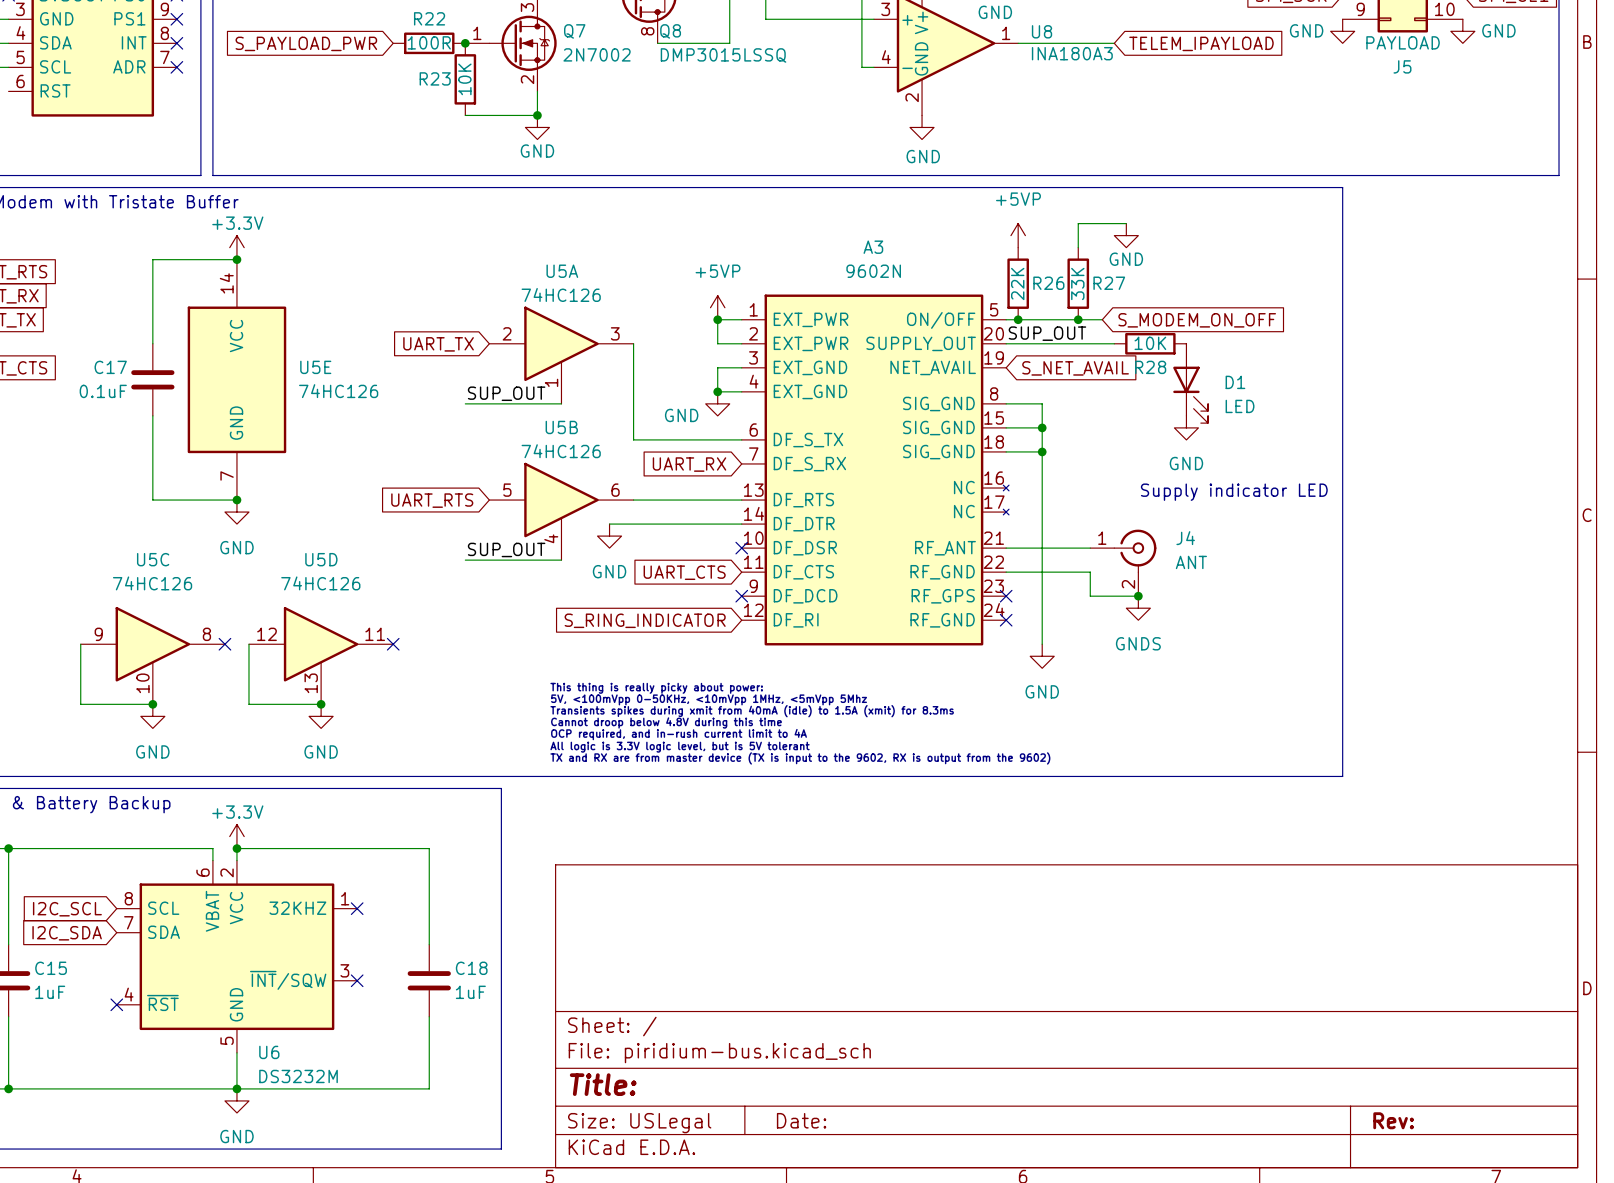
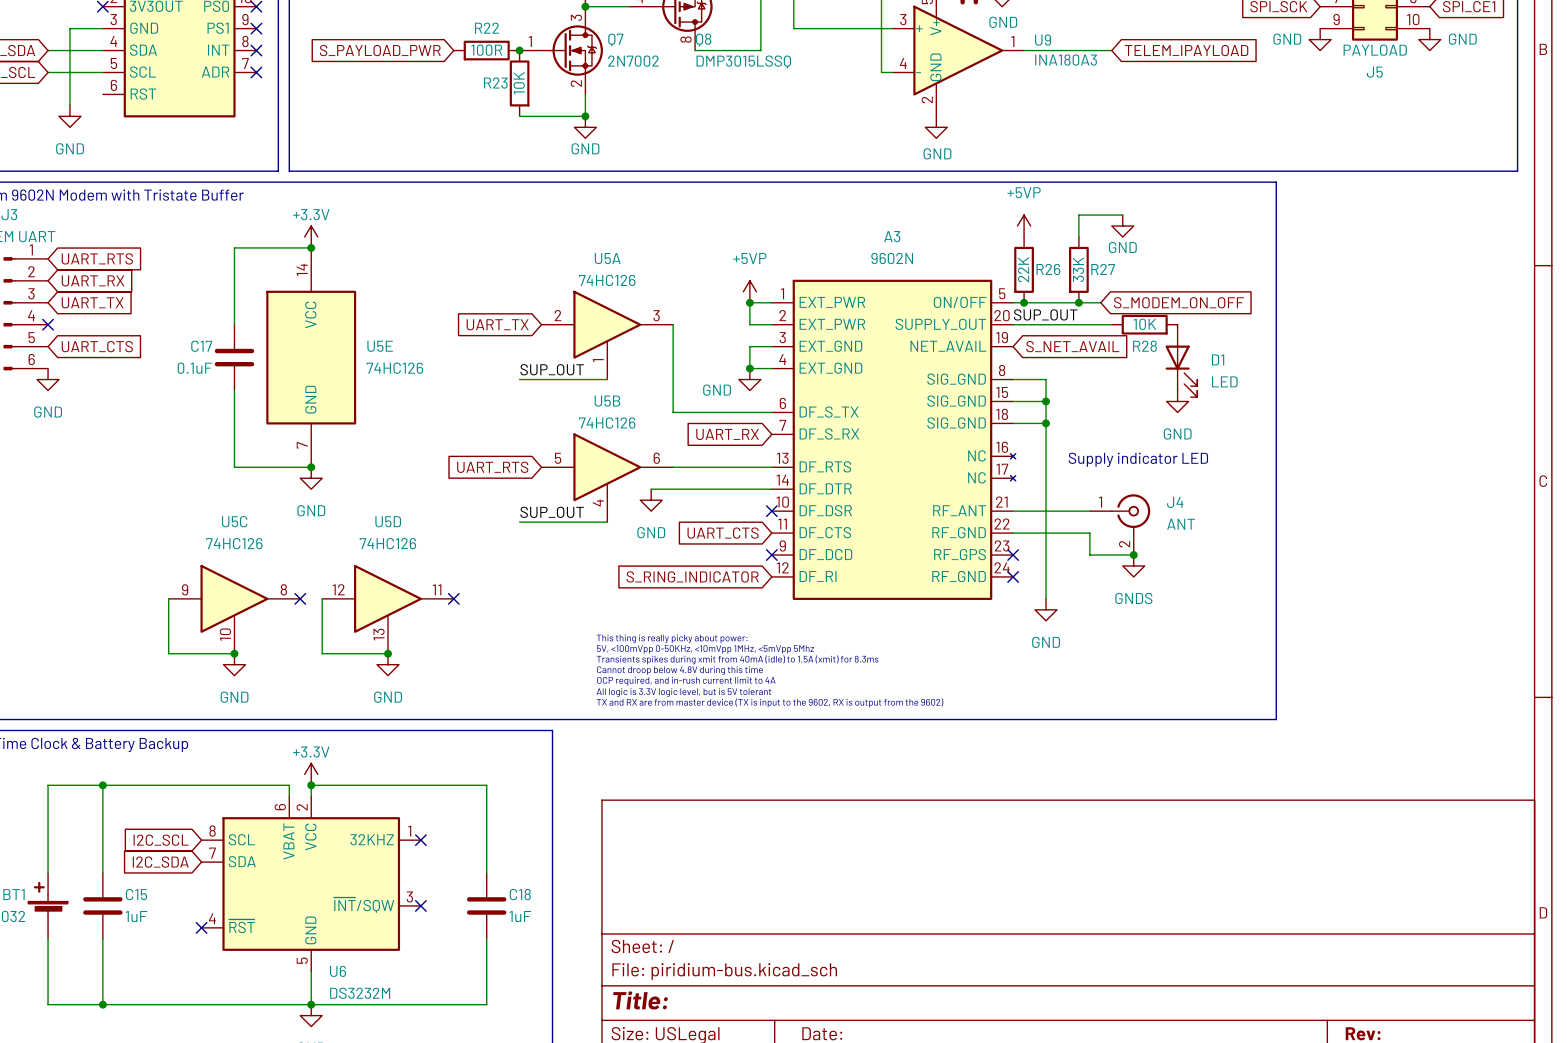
U8 name: U8 (1042, 31) -> U9 (1043, 40)
line: (1294, 187) (1342, 187) (1342, 776) (1294, 776) -> (1276, 182) (1276, 719)
text position: Supply indicator LED (1234, 492) -> Supply indicator LED (1138, 459)

